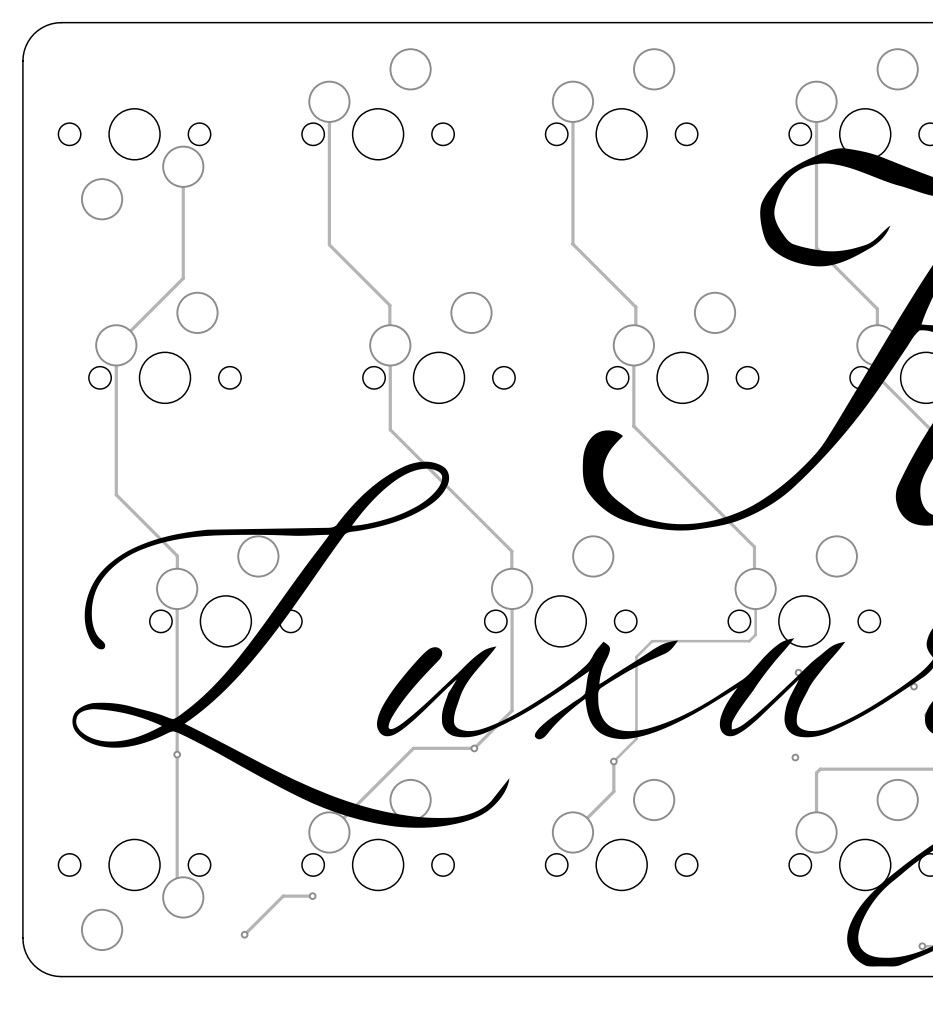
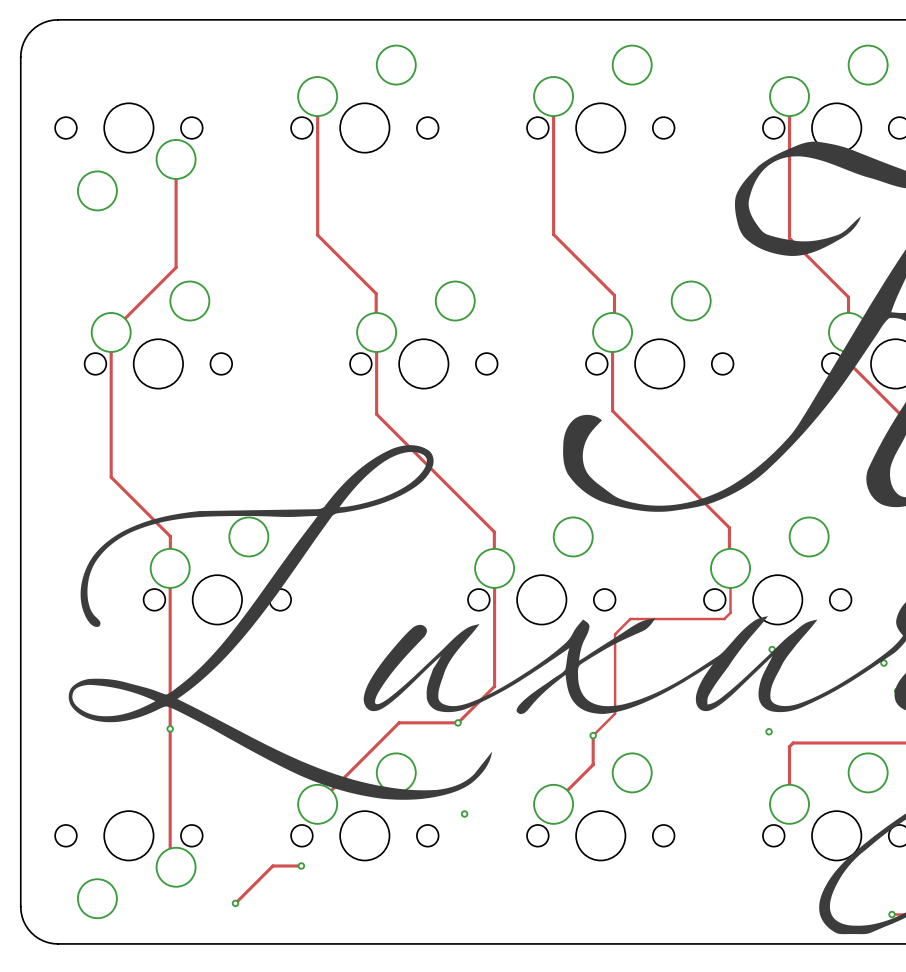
via: none -> (464, 813)

